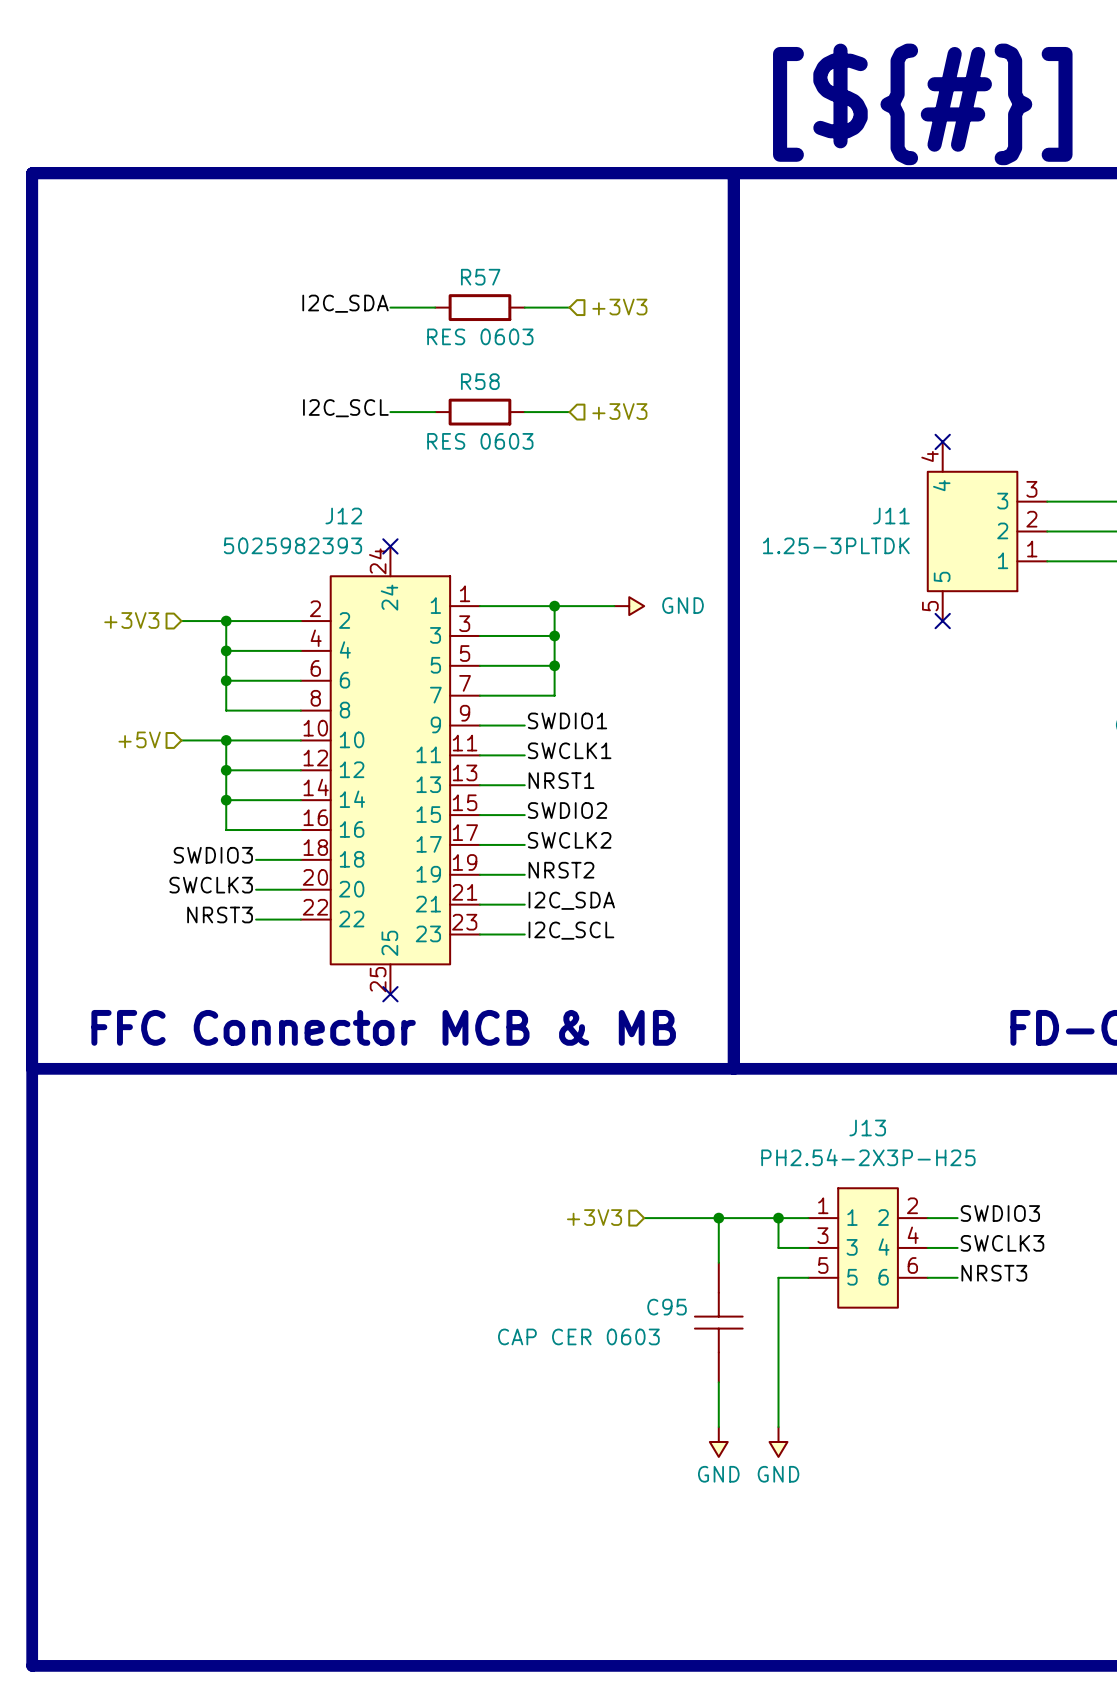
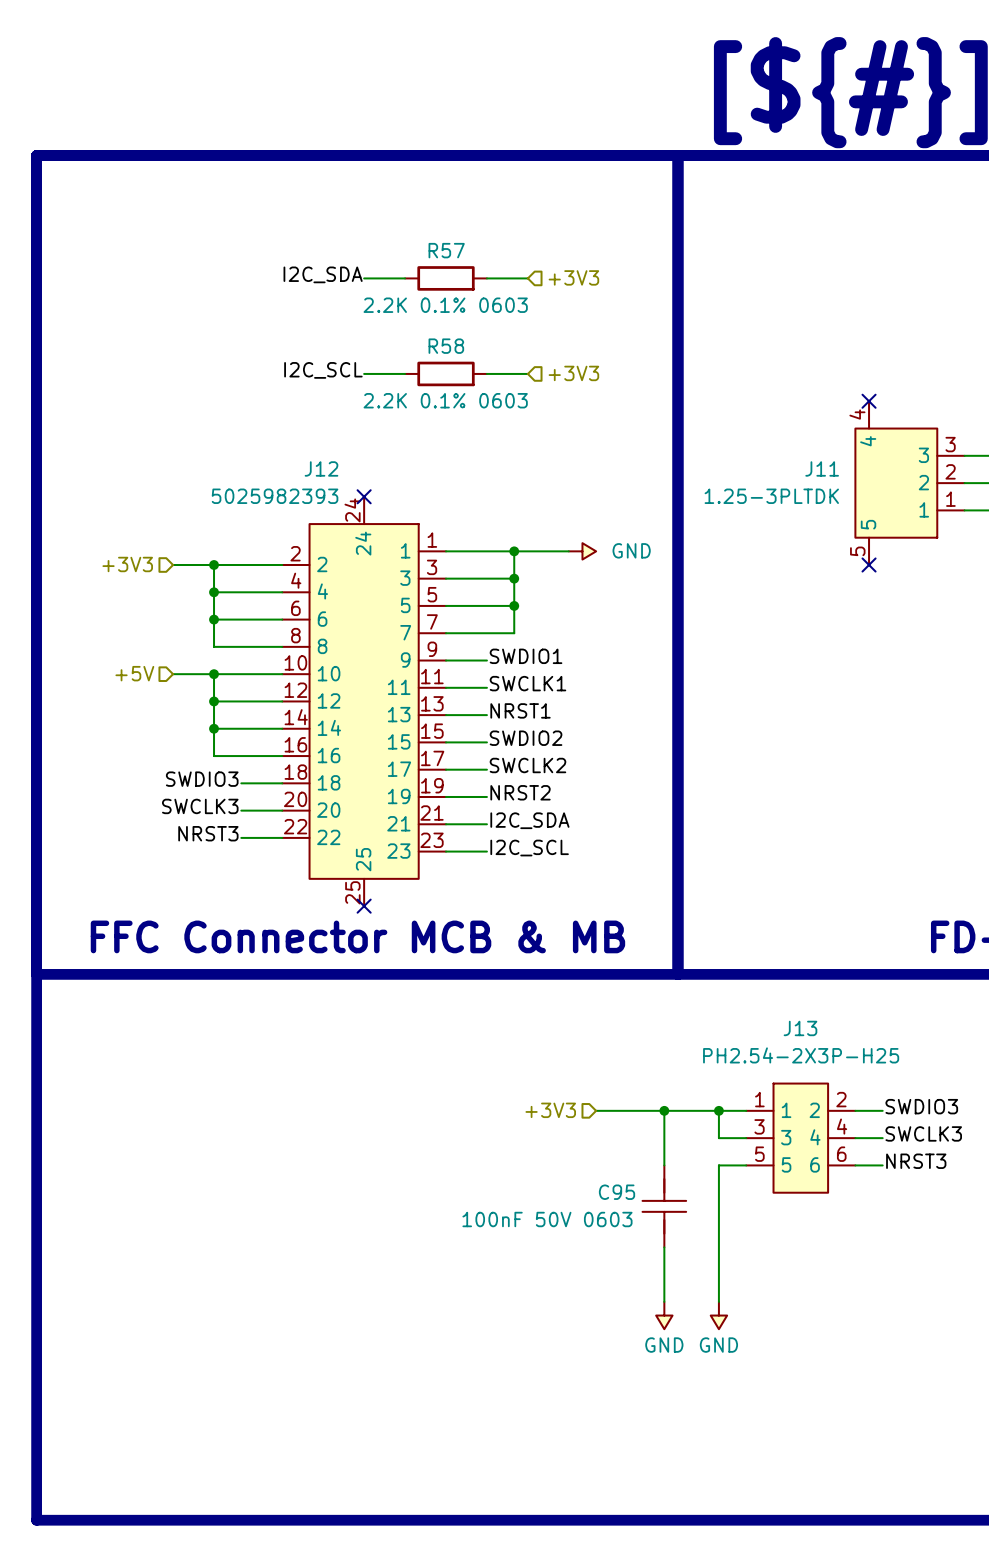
R57 value: RES 0603 (480, 336) -> 2.2K 0.1% 0603 (445, 305)
R58 value: RES 0603 (480, 441) -> 2.2K 0.1% 0603 (445, 400)
C95 symbol: [694, 1262, 743, 1383] -> [642, 1165, 687, 1248]
C95 value: CAP CER 0603 (578, 1336) -> 100nF 50V 0603 (547, 1219)

